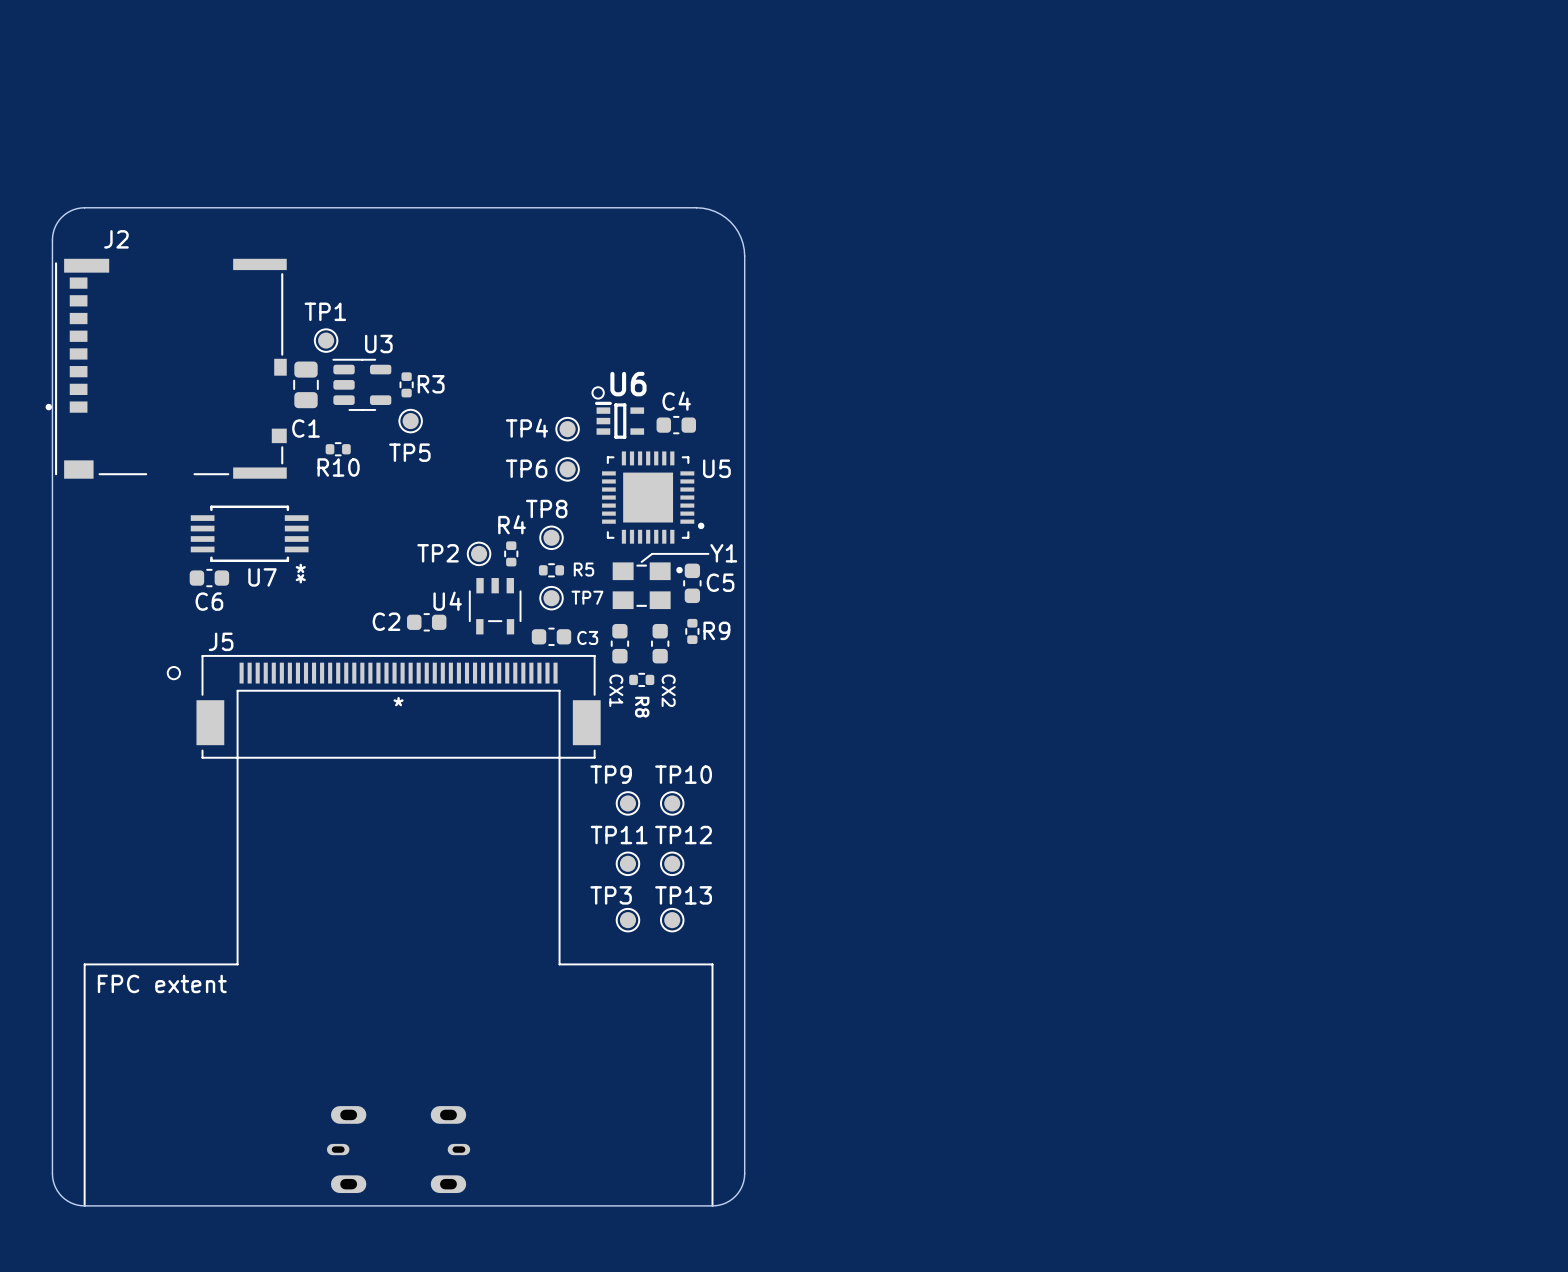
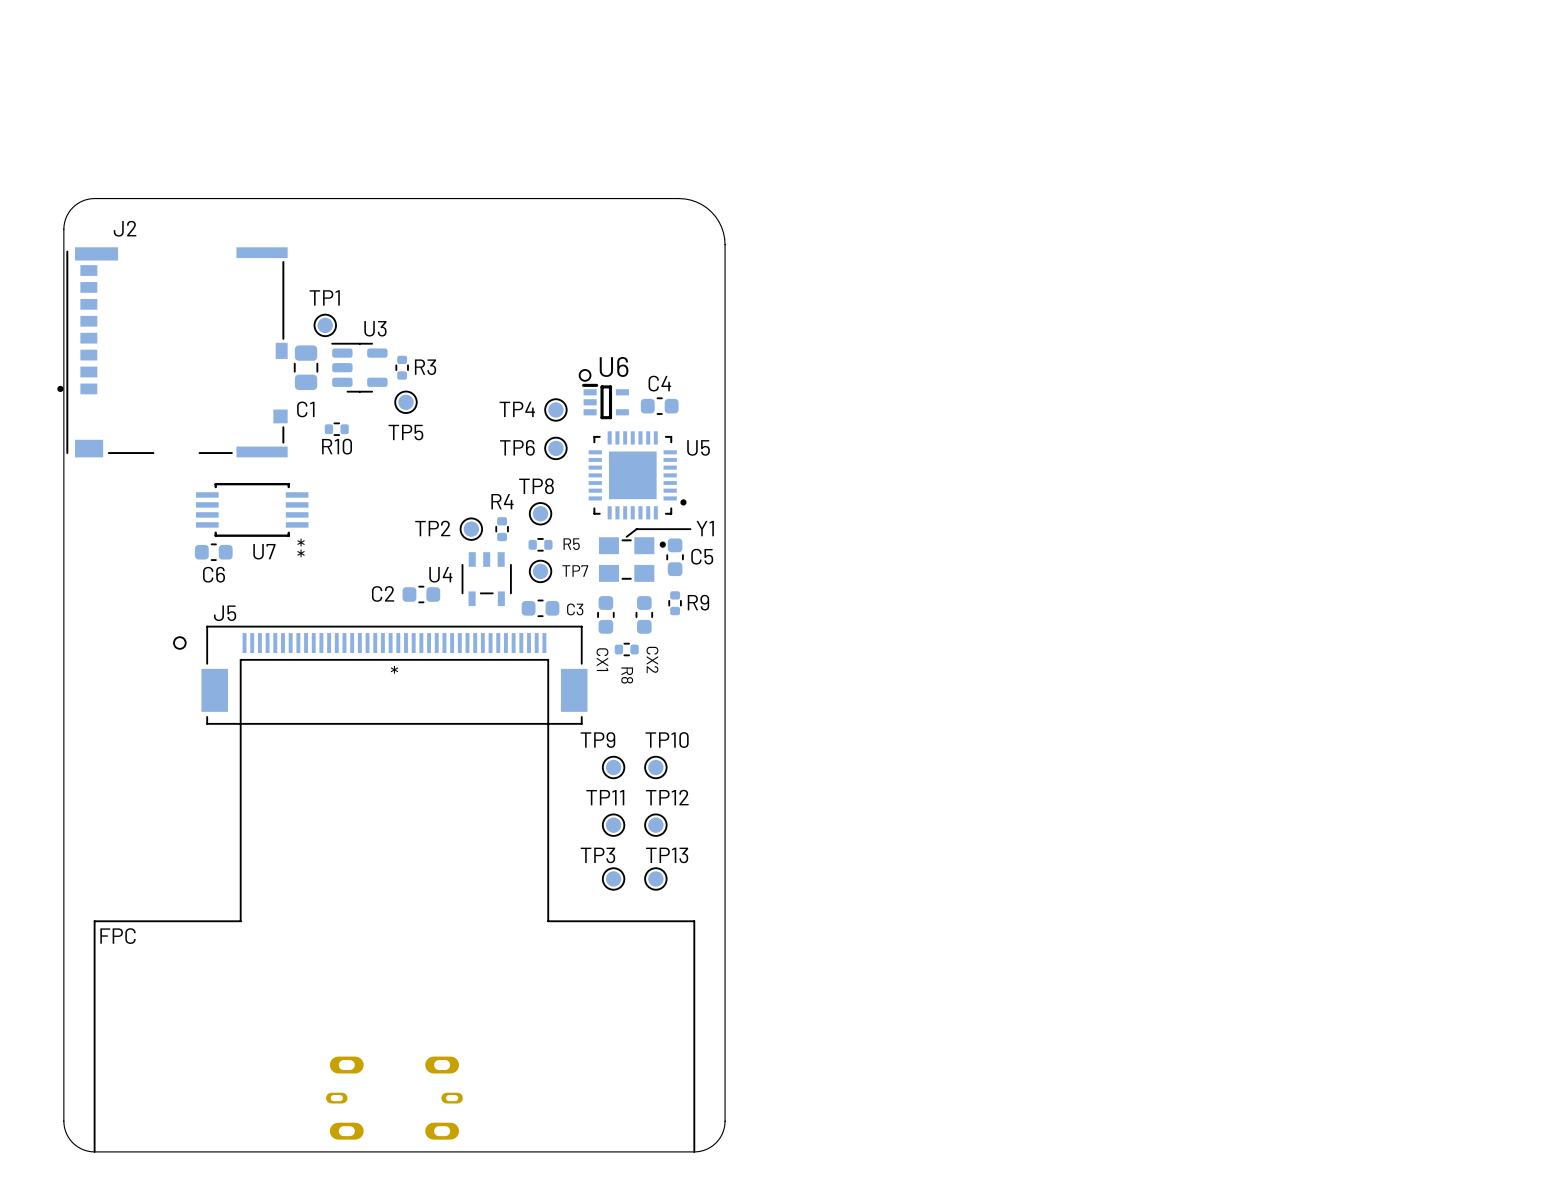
text: none -> FPC (117, 936)
text: FPC extent (162, 983) -> none

